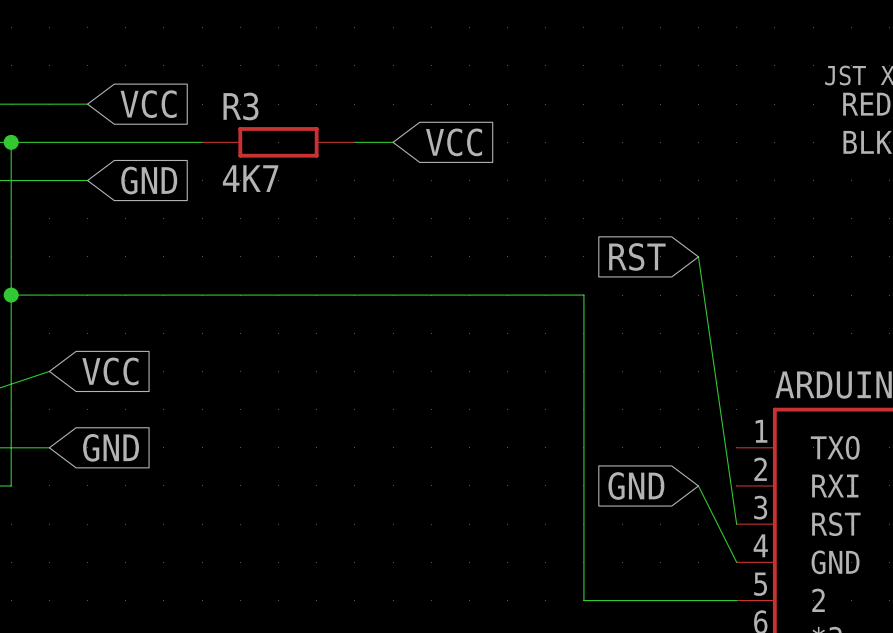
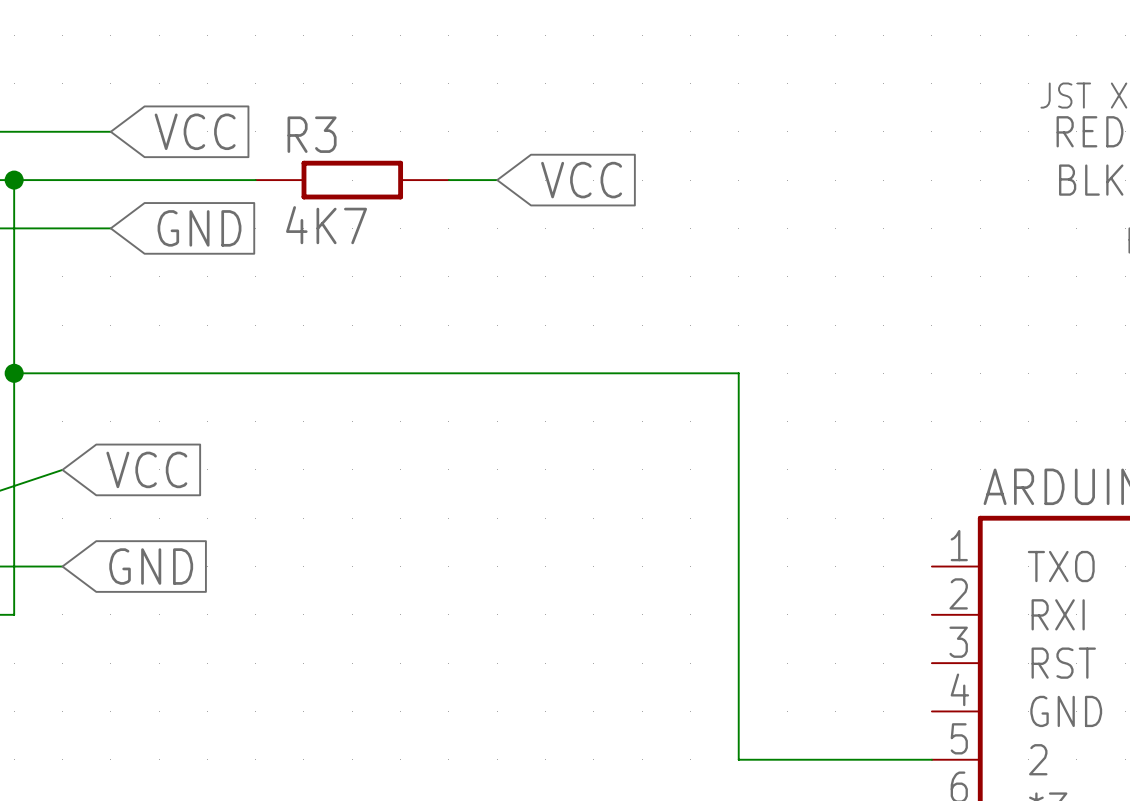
global label: RST (637, 256) -> none
wire: (698, 256) (736, 524) -> none
wire: (698, 485) (736, 562) -> none
global label: GND (636, 486) -> none

